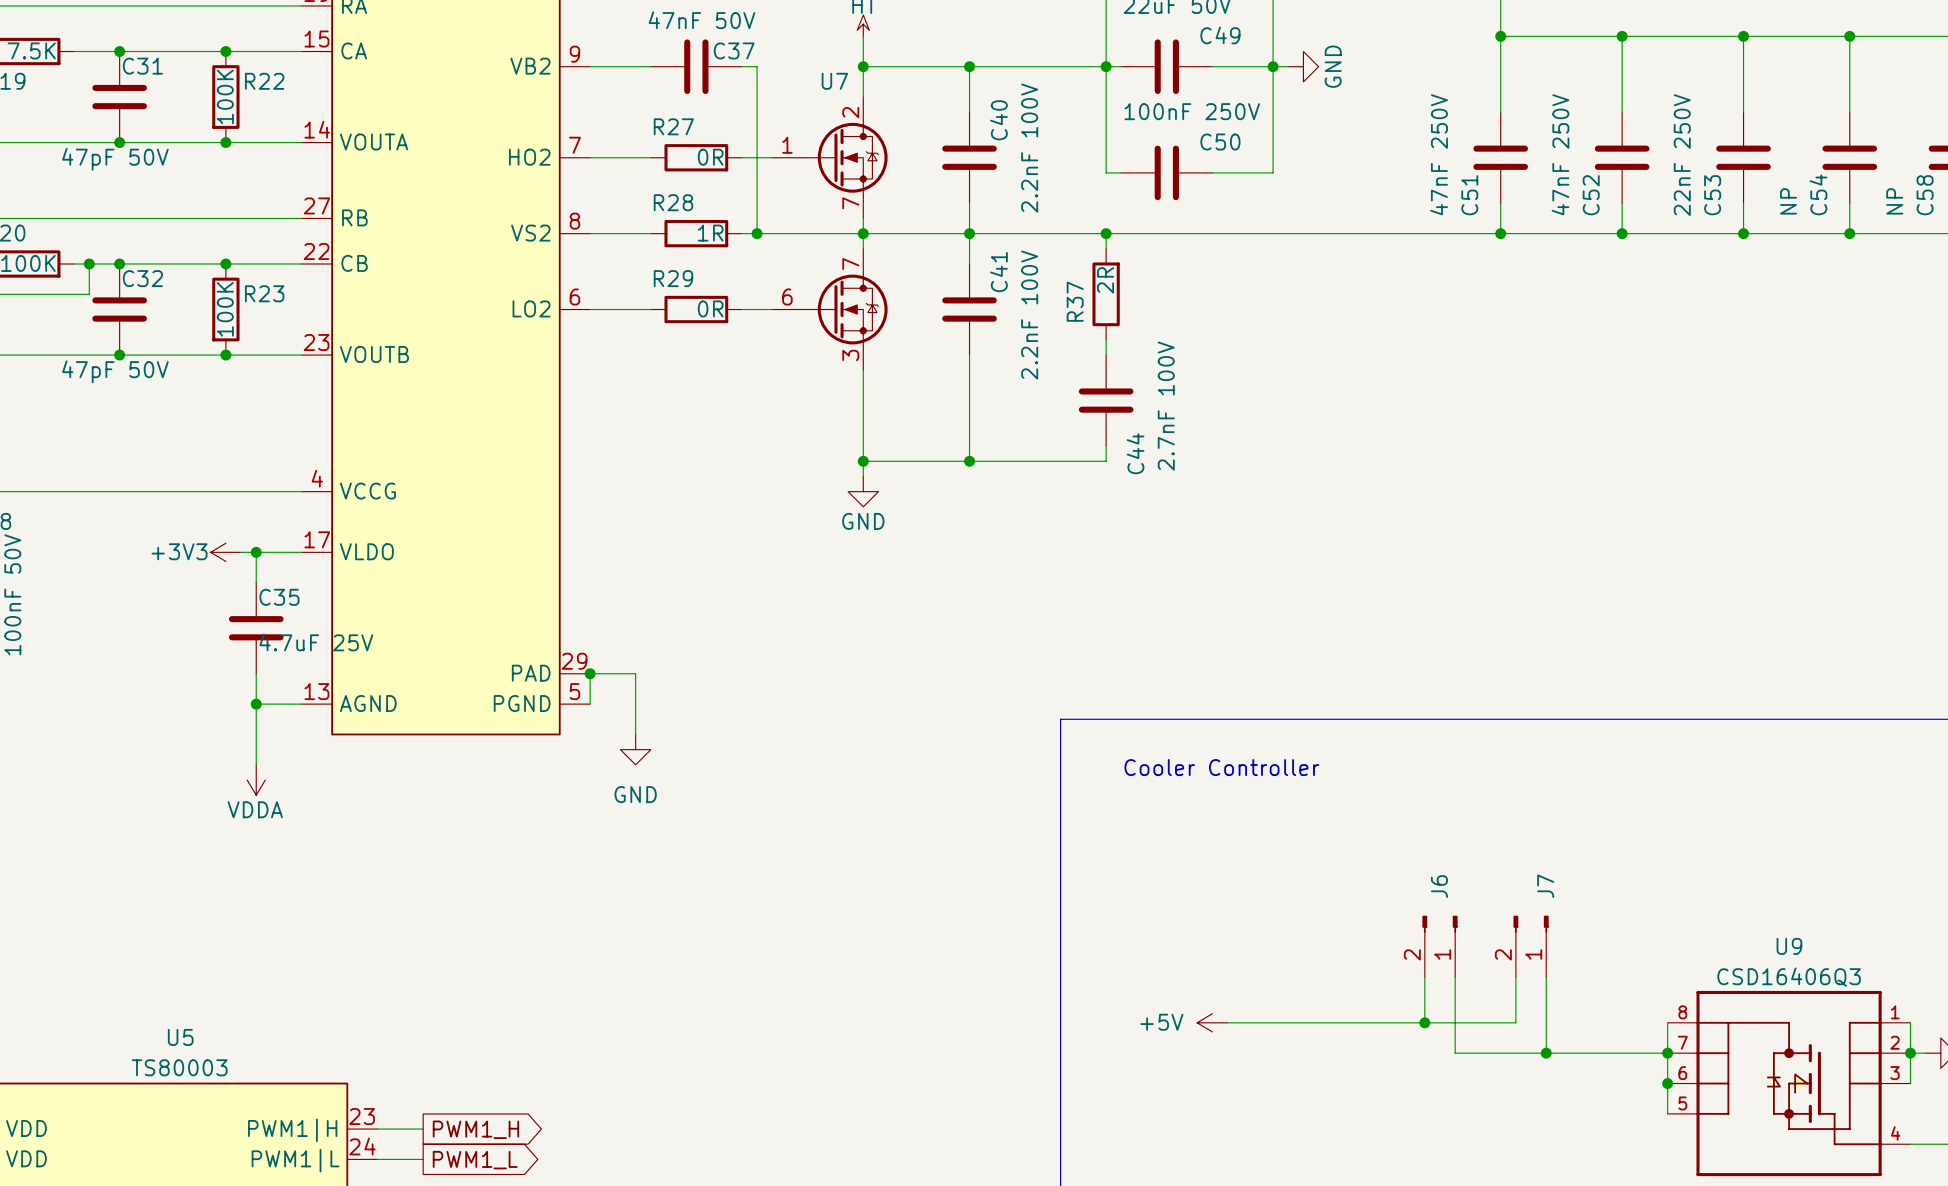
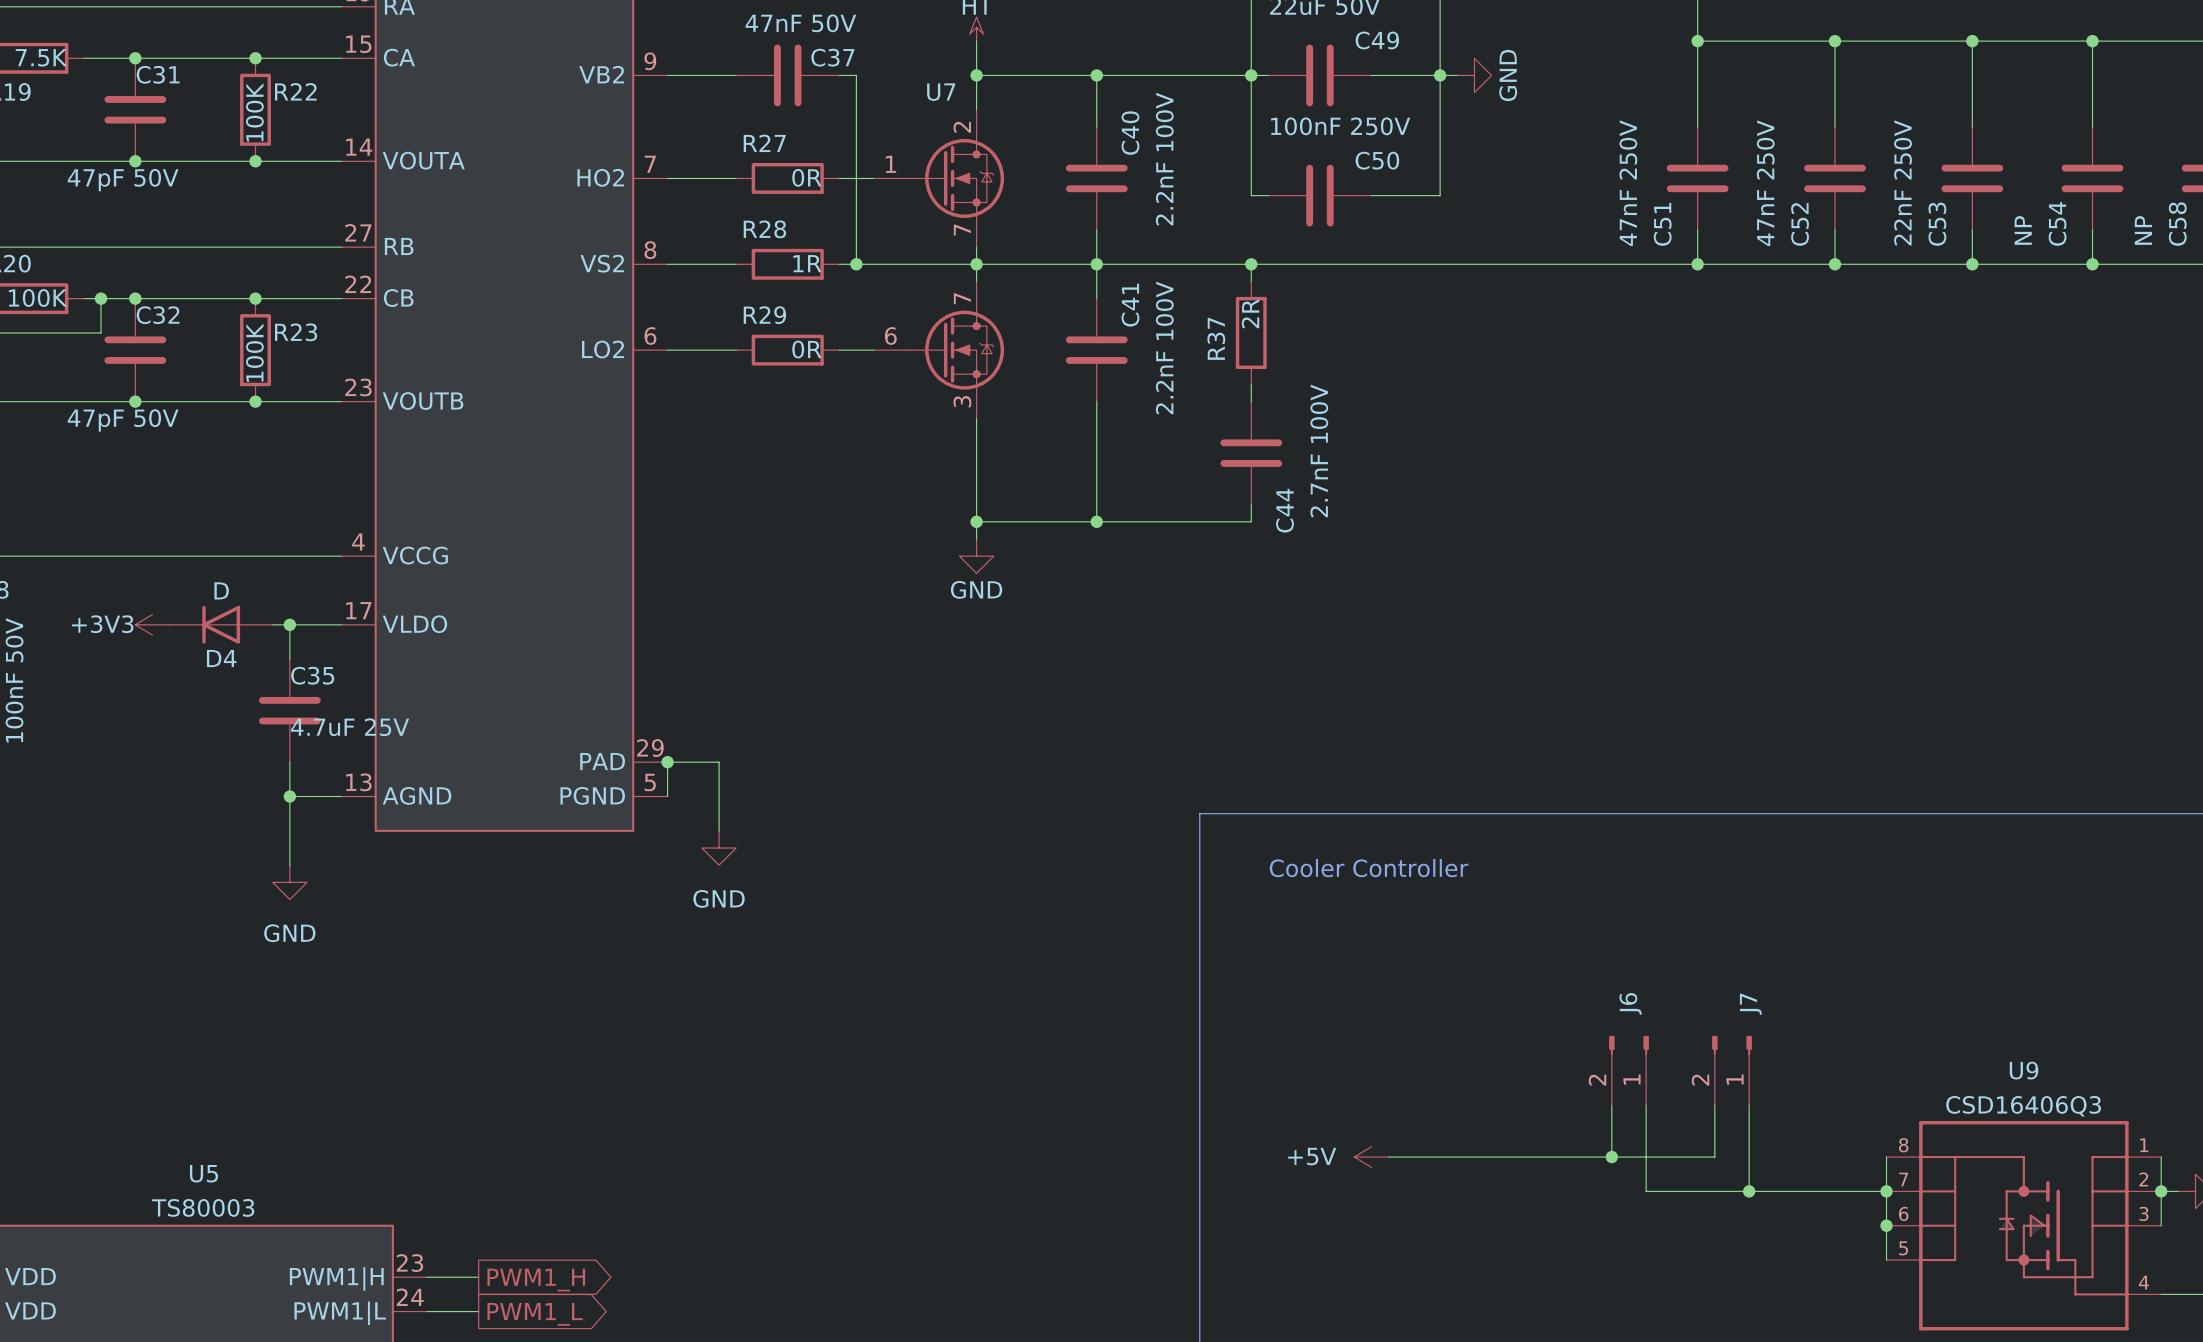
D4: none -> D (221, 624)
power symbol position: +3V3 (225, 552) -> +3V3 (152, 624)
power symbol: VDDA (256, 779) -> GND (289, 882)

